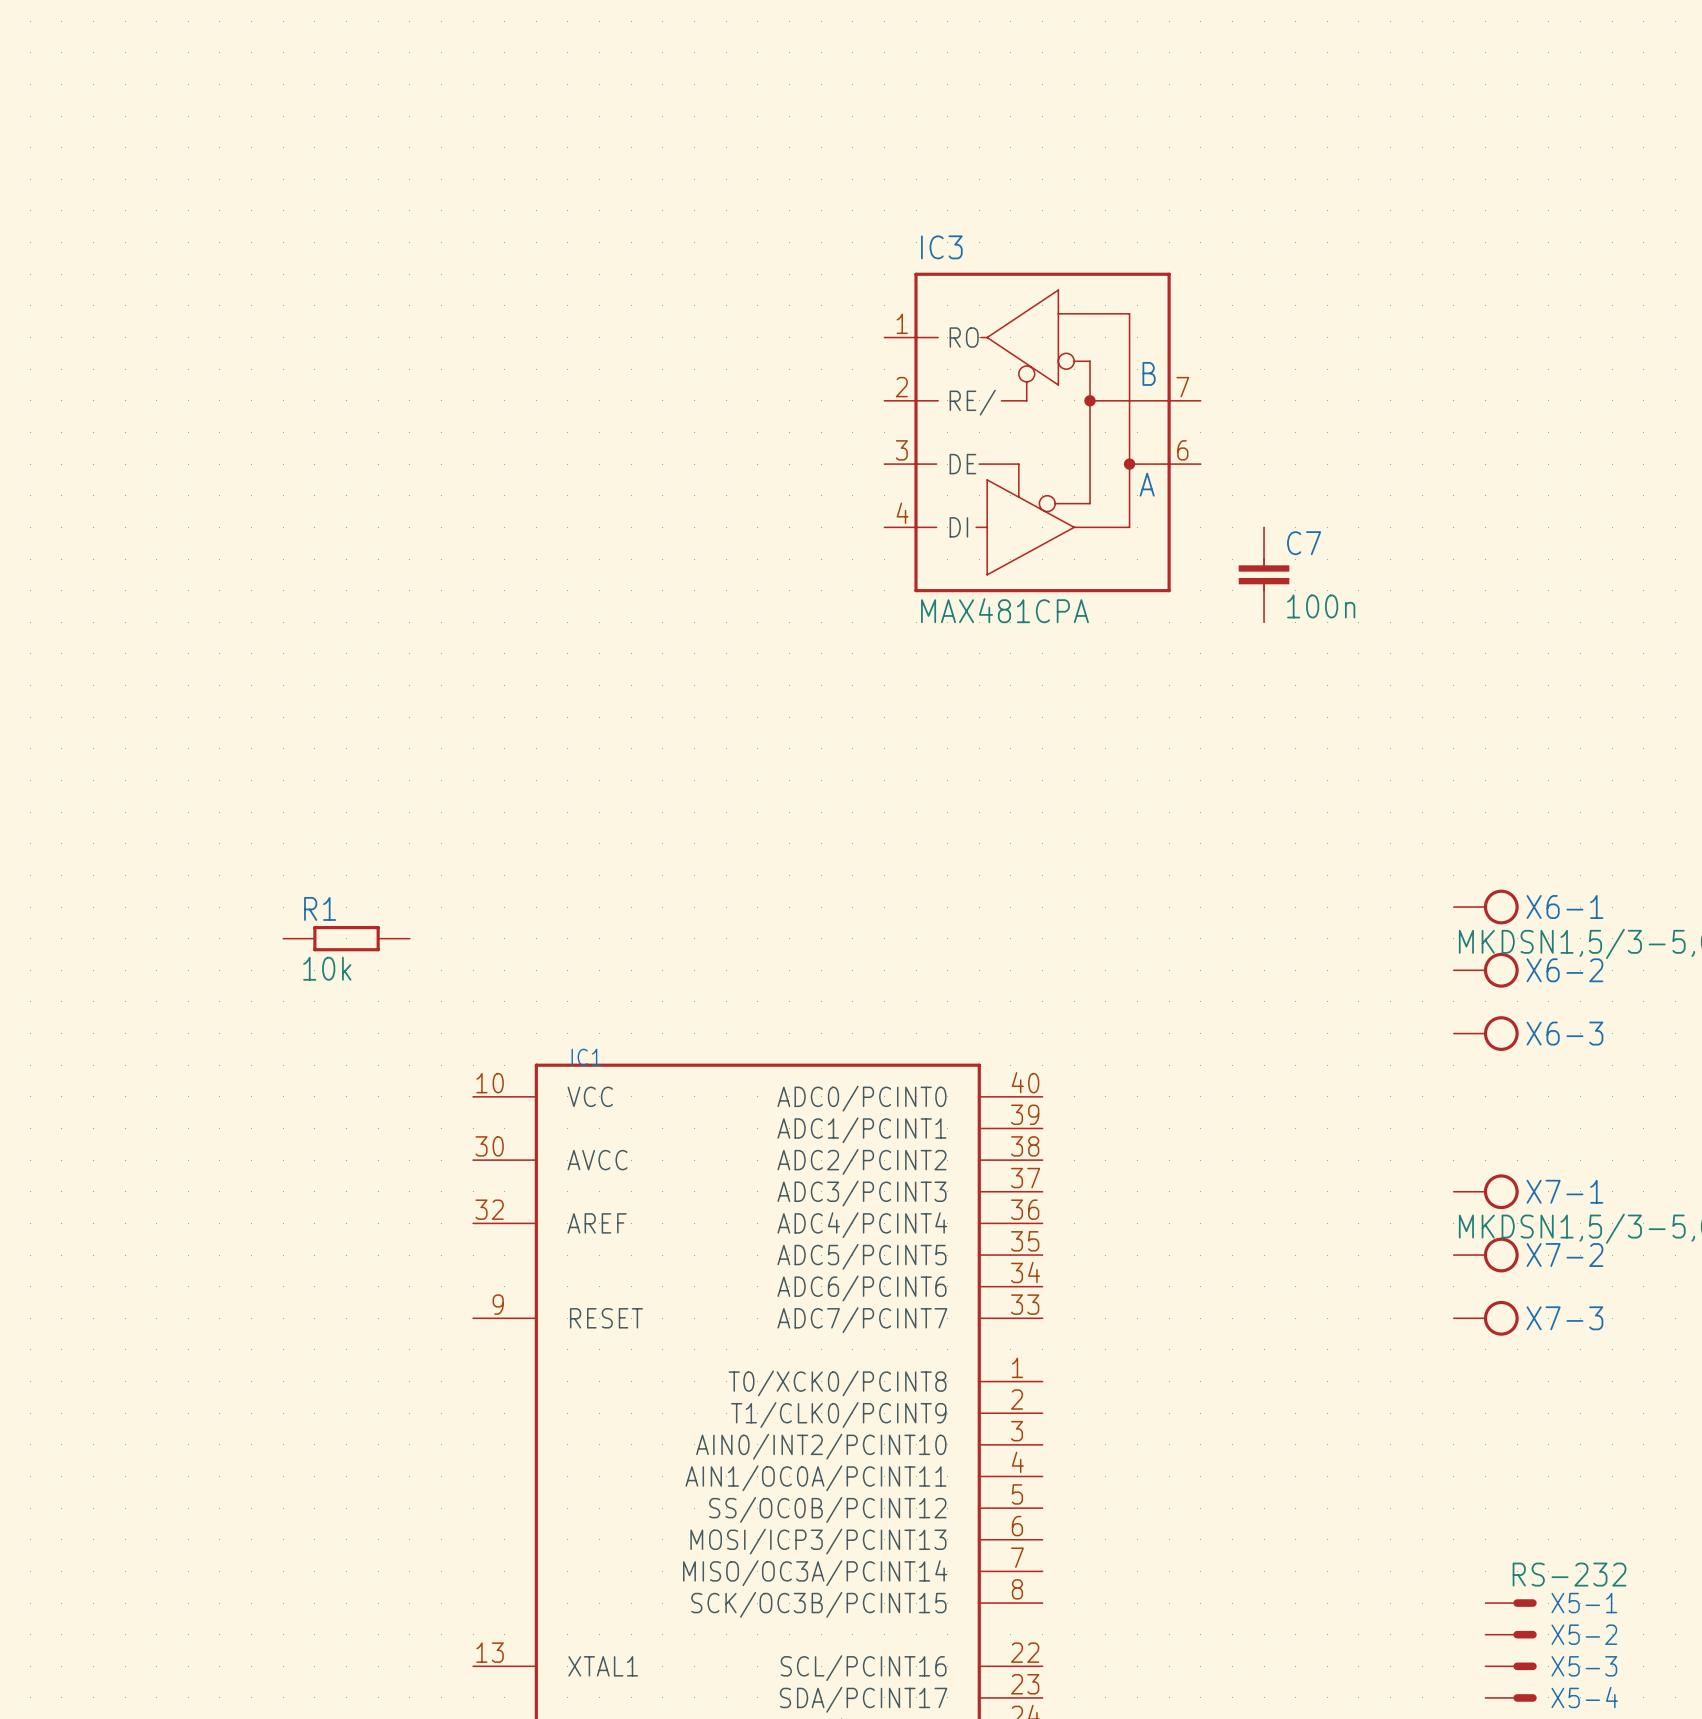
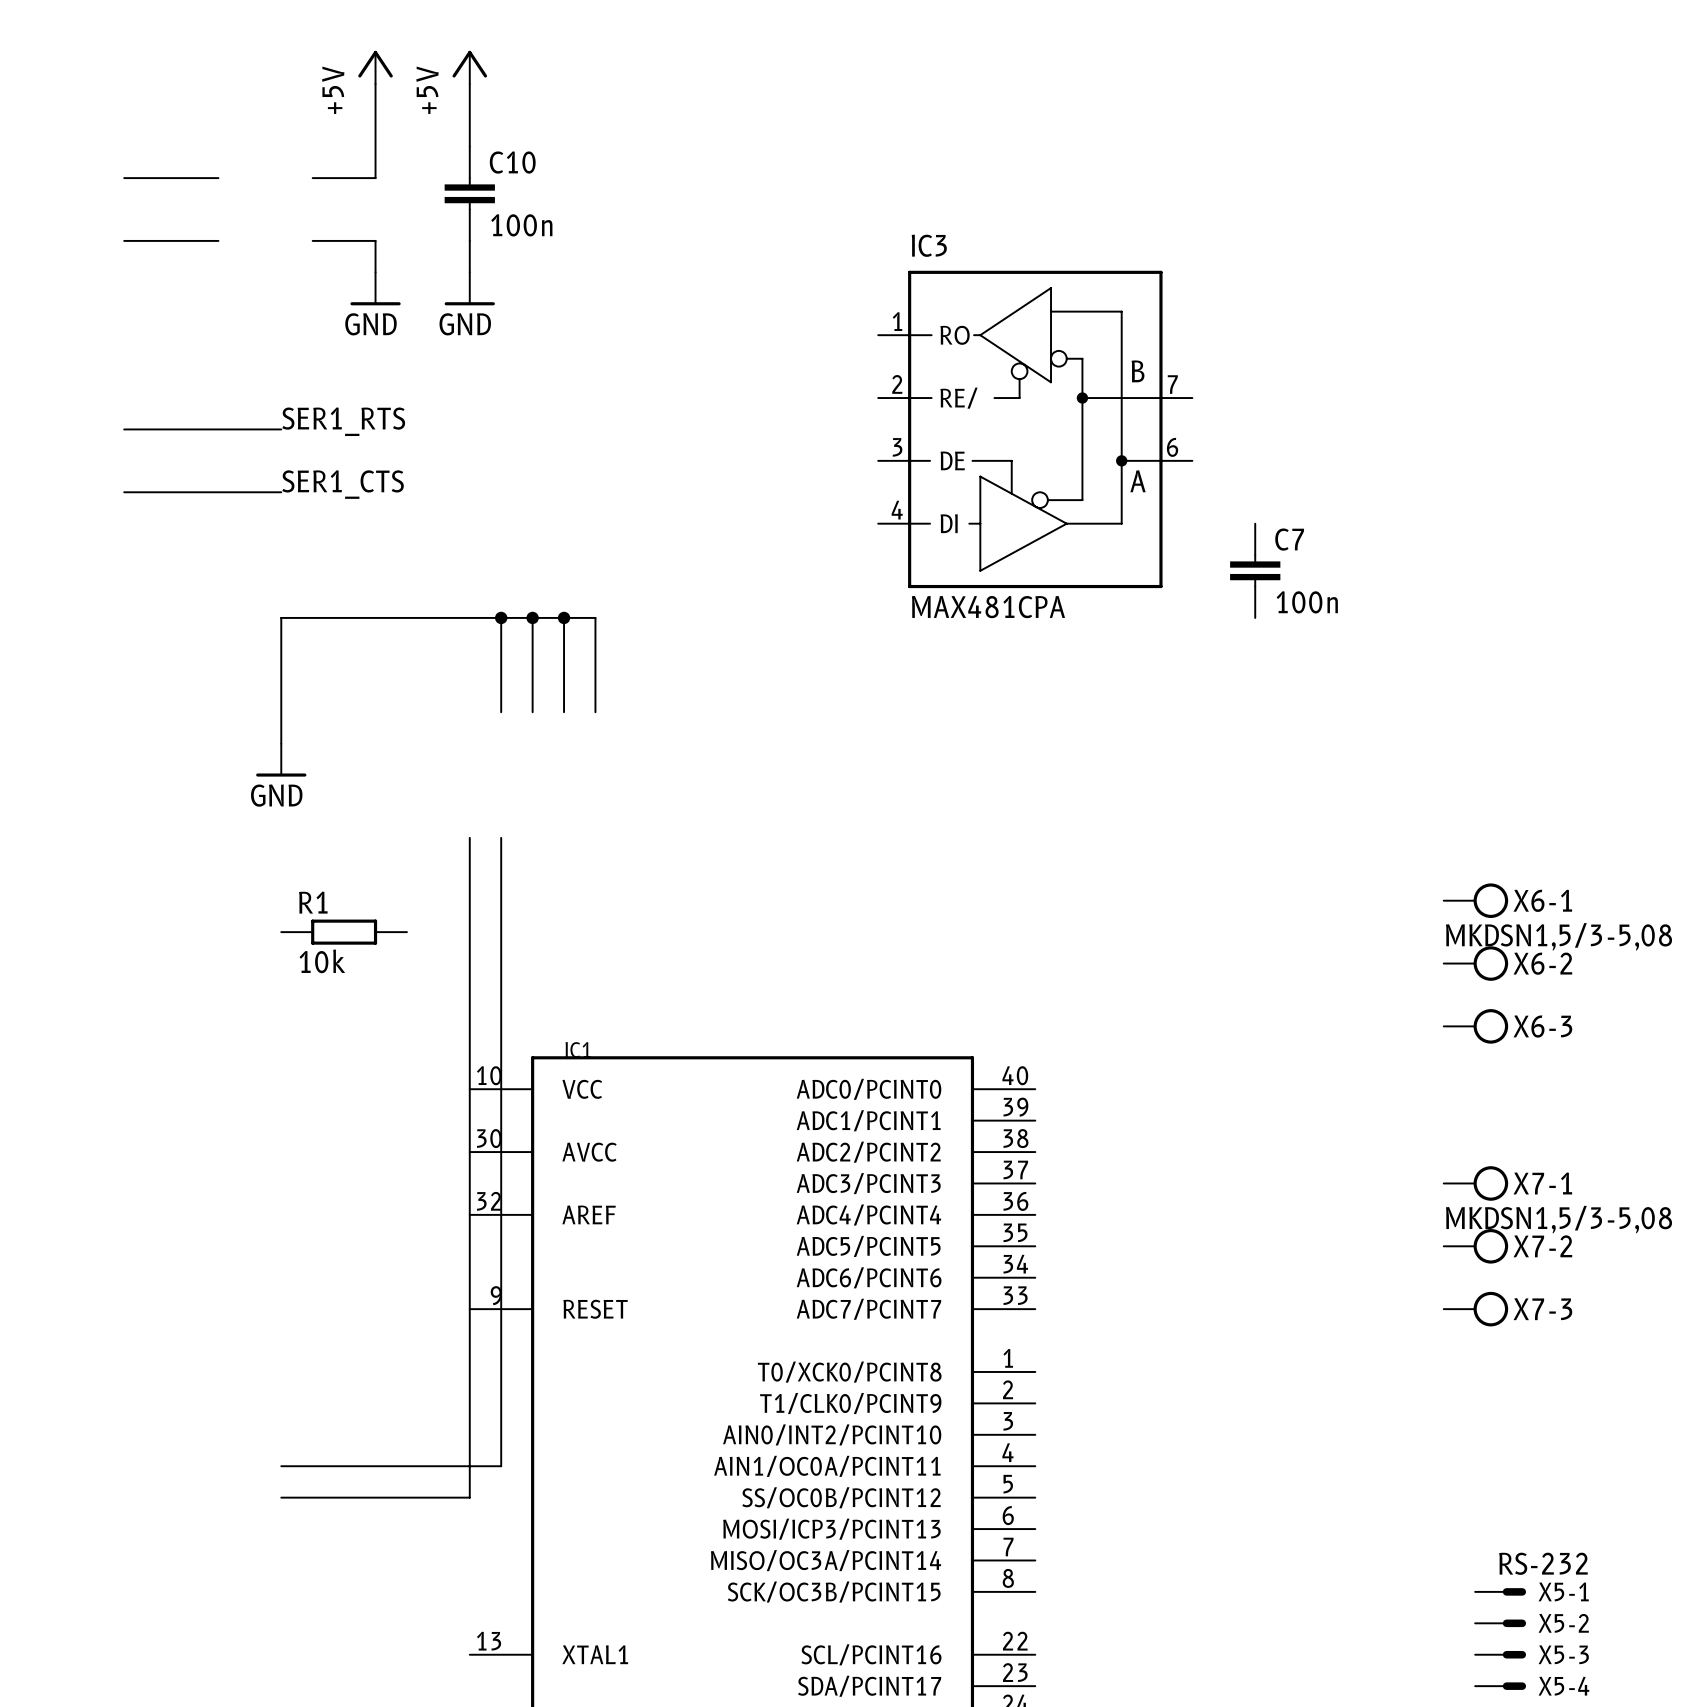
power symbol: none -> +5V (375, 67)
power symbol: none -> +5V (469, 67)
wire: none -> (375, 83) (375, 178) (312, 178)
wire: none -> (469, 83) (469, 146)
wire: none -> (124, 178) (218, 178)
C10: none -> 100n (469, 193)
wire: none -> (124, 240) (218, 240)
wire: none -> (312, 240) (375, 240) (375, 272)
wire: none -> (469, 240) (469, 272)
power symbol: none -> GND (375, 288)
power symbol: none -> GND (469, 288)
label: none -> SER1_RTS (343, 421)
wire: none -> (124, 429) (281, 429)
label: none -> SER1_CTS (343, 484)
wire: none -> (124, 492) (281, 492)
wire: none -> (501, 617) (501, 712)
junction: none -> (501, 617)
wire: none -> (532, 617) (532, 712)
junction: none -> (532, 617)
wire: none -> (564, 617) (564, 712)
junction: none -> (564, 617)
wire: none -> (595, 712) (595, 617) (281, 617) (281, 743)
power symbol: none -> GND (281, 760)
wire: none -> (469, 837) (469, 1497) (281, 1497)
wire: none -> (501, 837) (501, 1466) (281, 1466)

